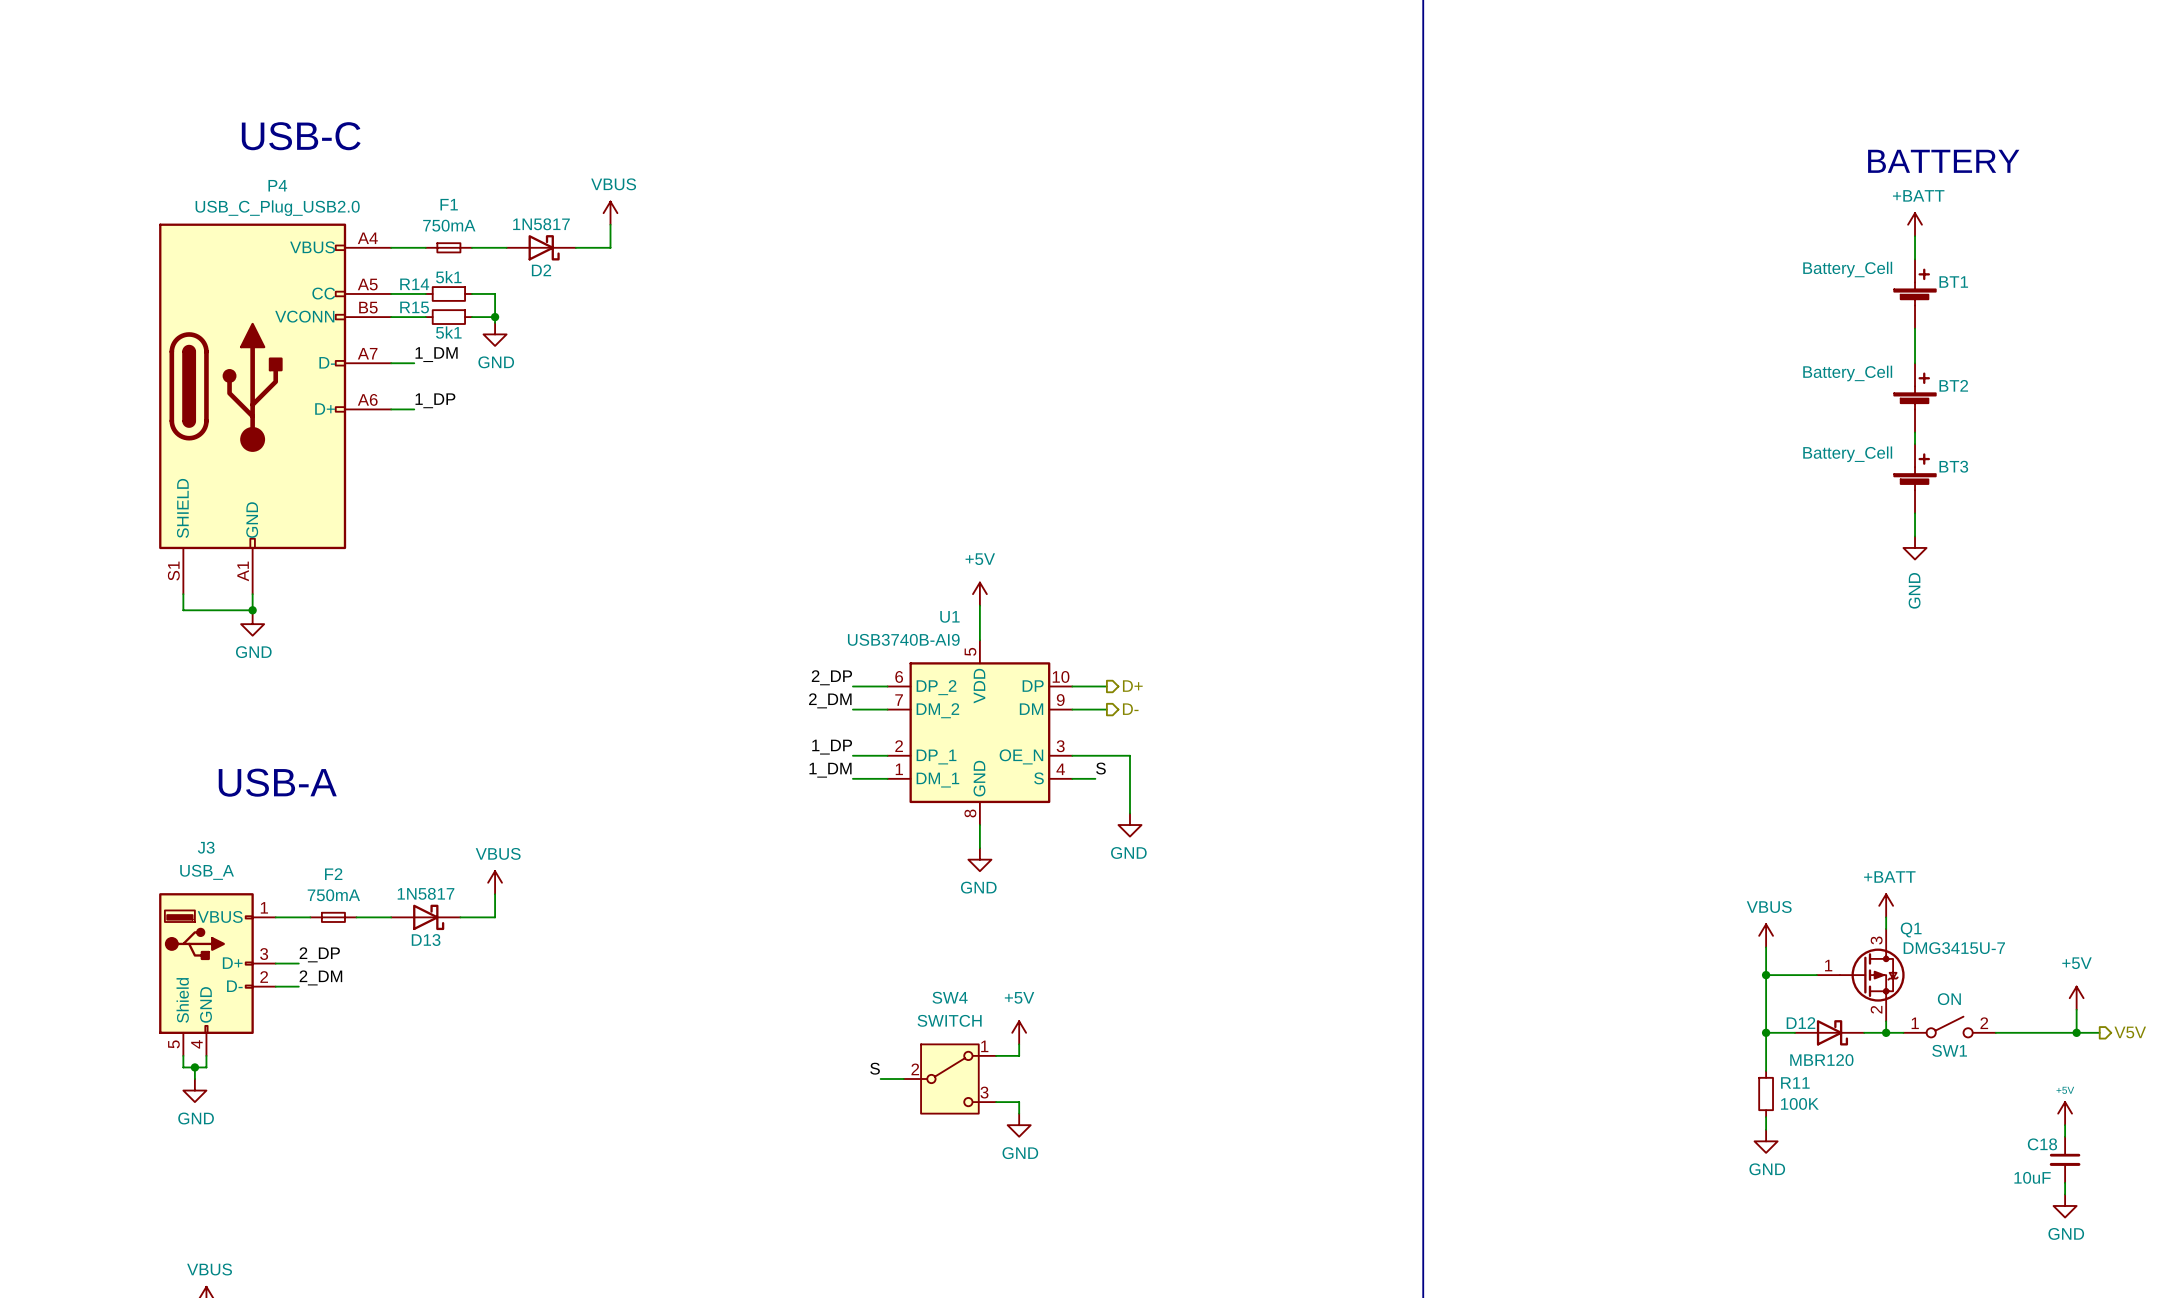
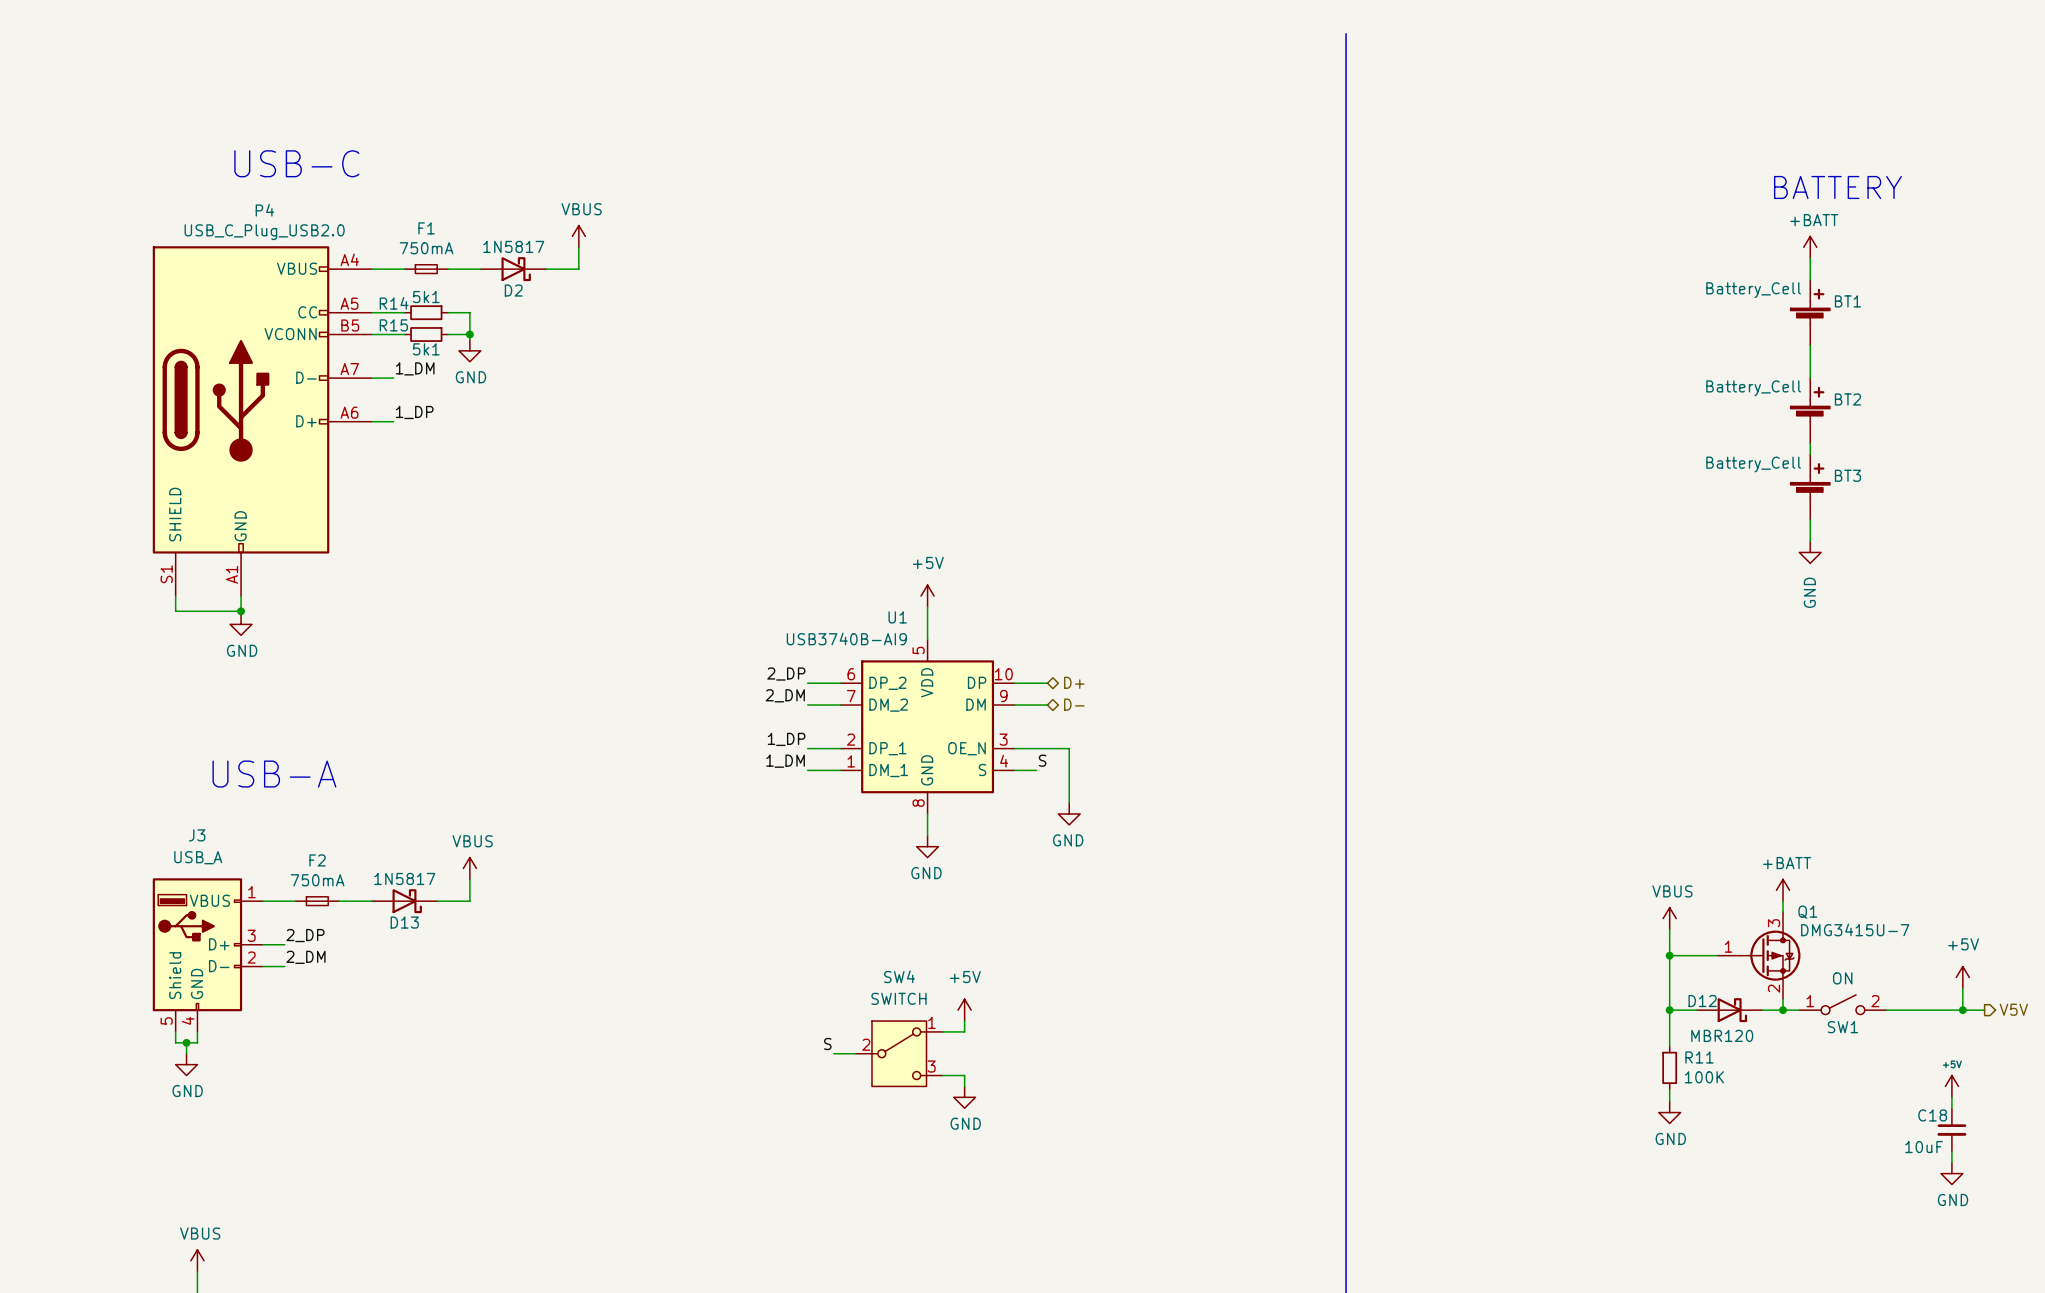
hierarchical label shape: output (1132, 686) -> bidirectional (1074, 682)
hierarchical label shape: output (1130, 709) -> bidirectional (1074, 704)

